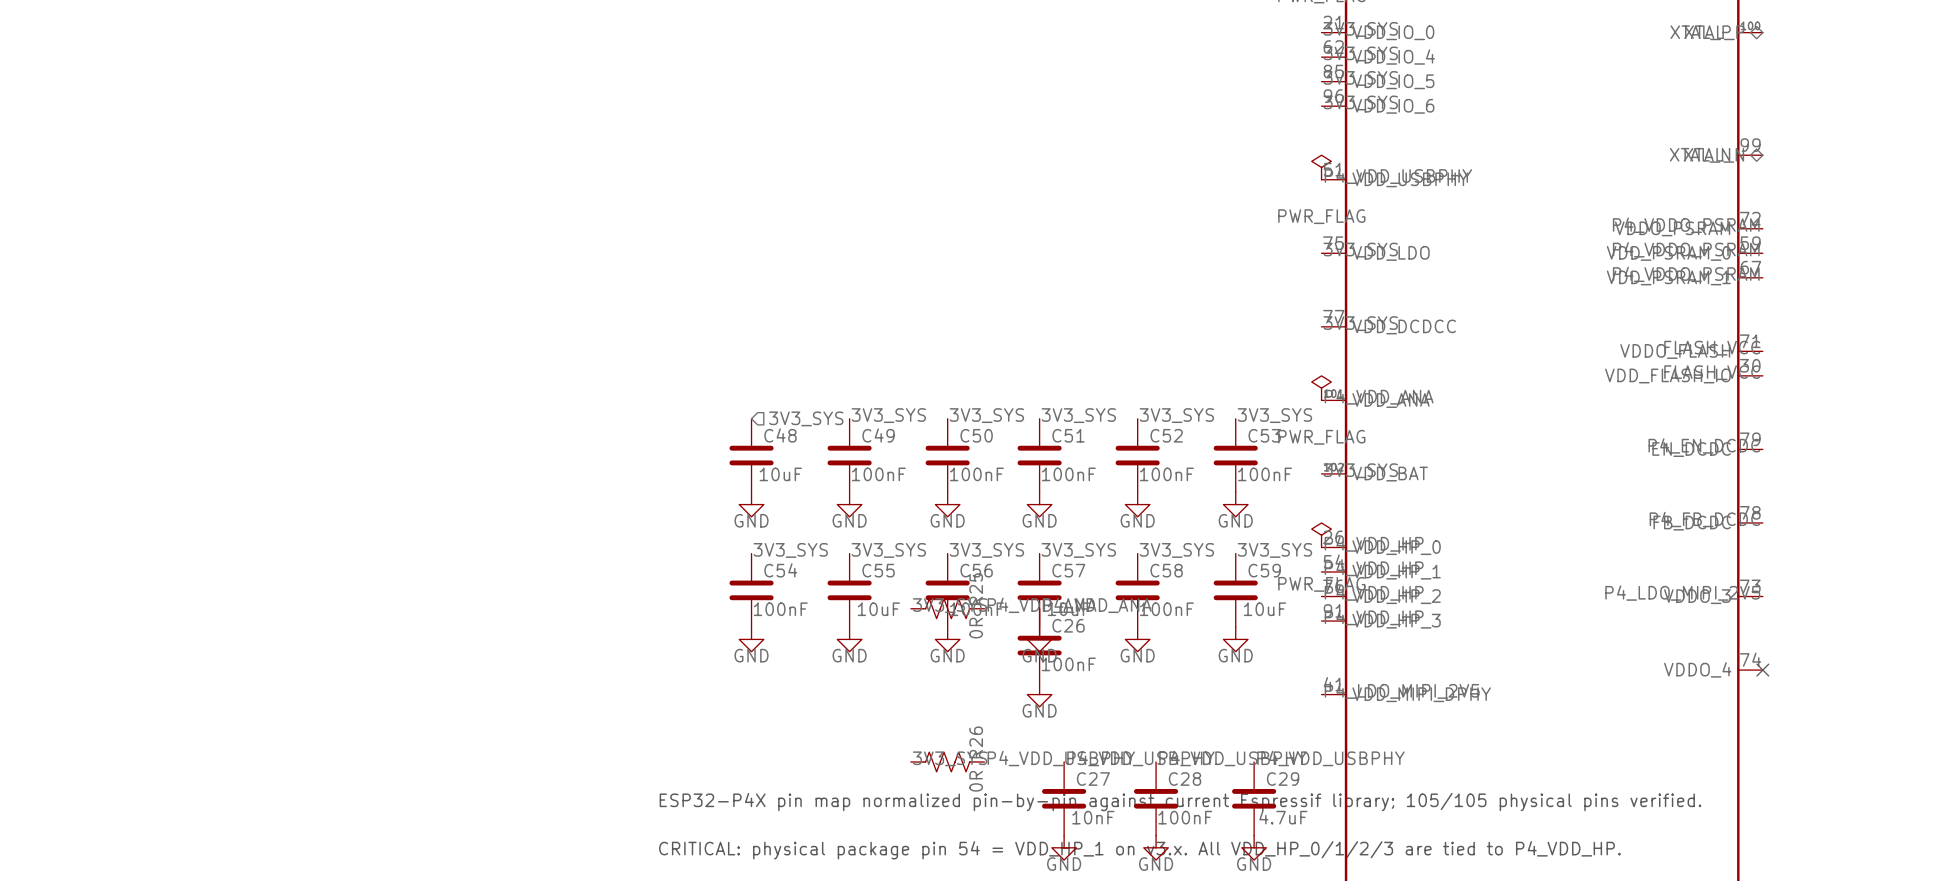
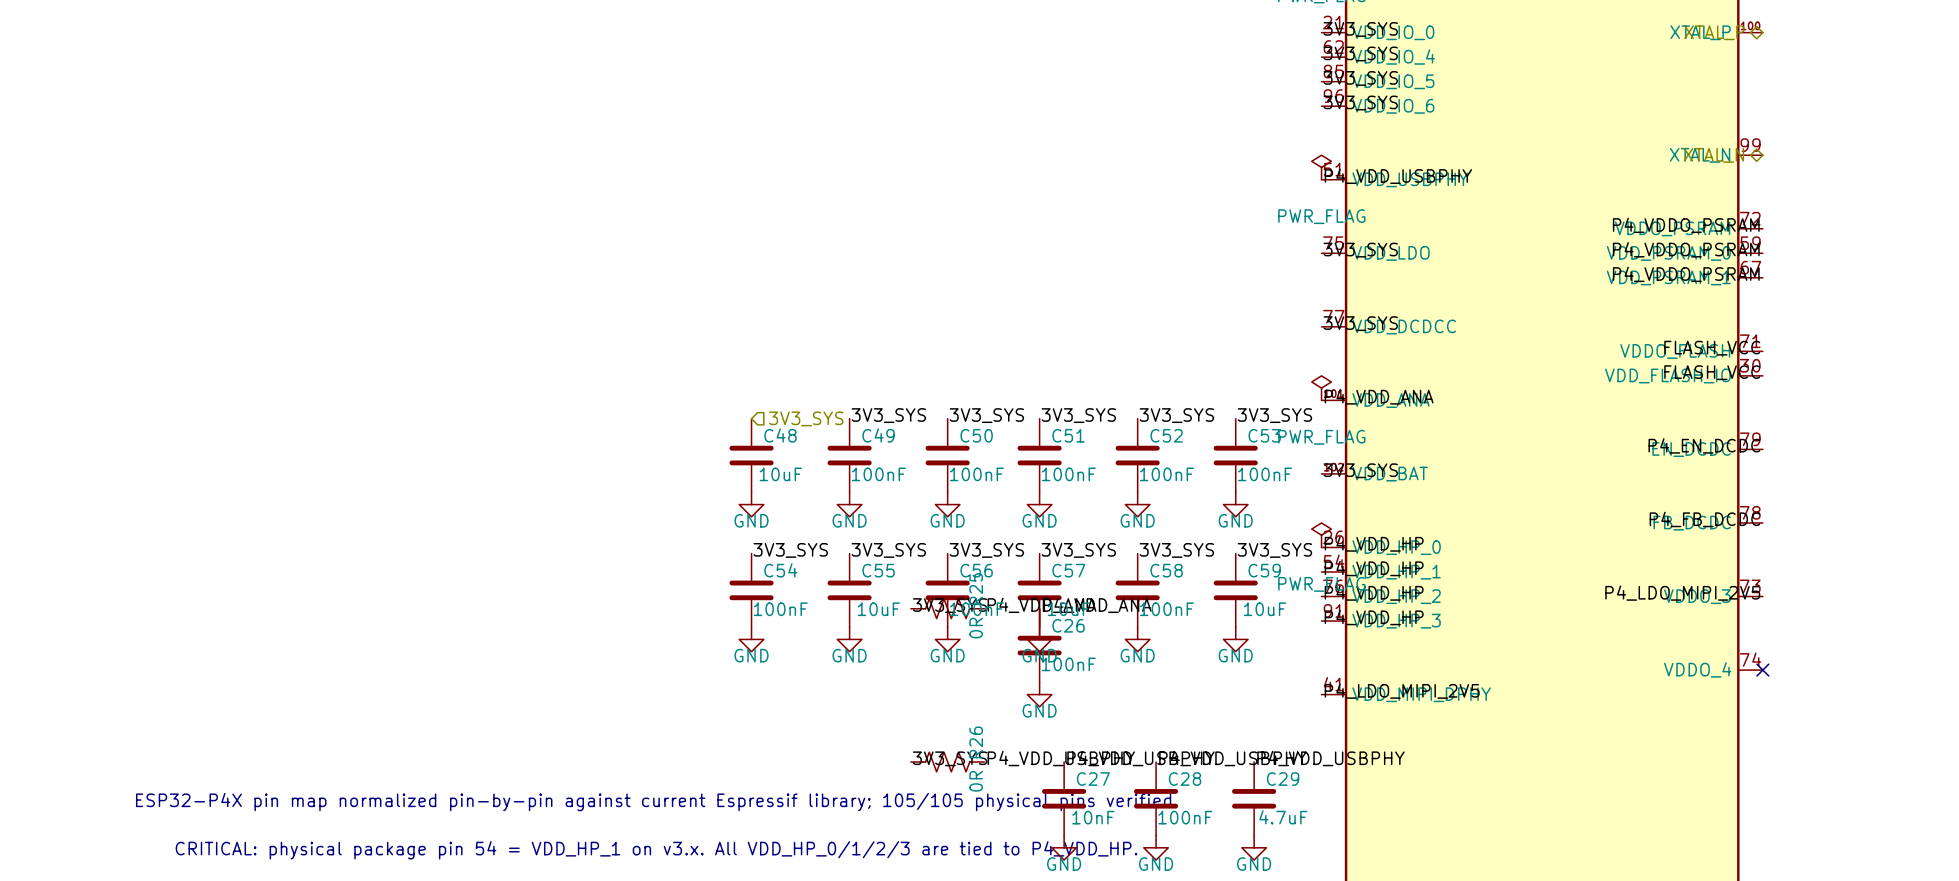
text position: ESP32-P4X pin map normalized pin-by-pin against current Espressif library; 105/105 physical pins verified. (1180, 802) -> ESP32-P4X pin map normalized pin-by-pin against current Espressif library; 105/105 physical pins verified. (656, 802)
text position: CRITICAL: physical package pin 54 = VDD_HP_1 on v3.x. All VDD_HP_0/1/2/3 are tied to P4_VDD_HP. (1139, 850) -> CRITICAL: physical package pin 54 = VDD_HP_1 on v3.x. All VDD_HP_0/1/2/3 are tied to P4_VDD_HP. (656, 850)

